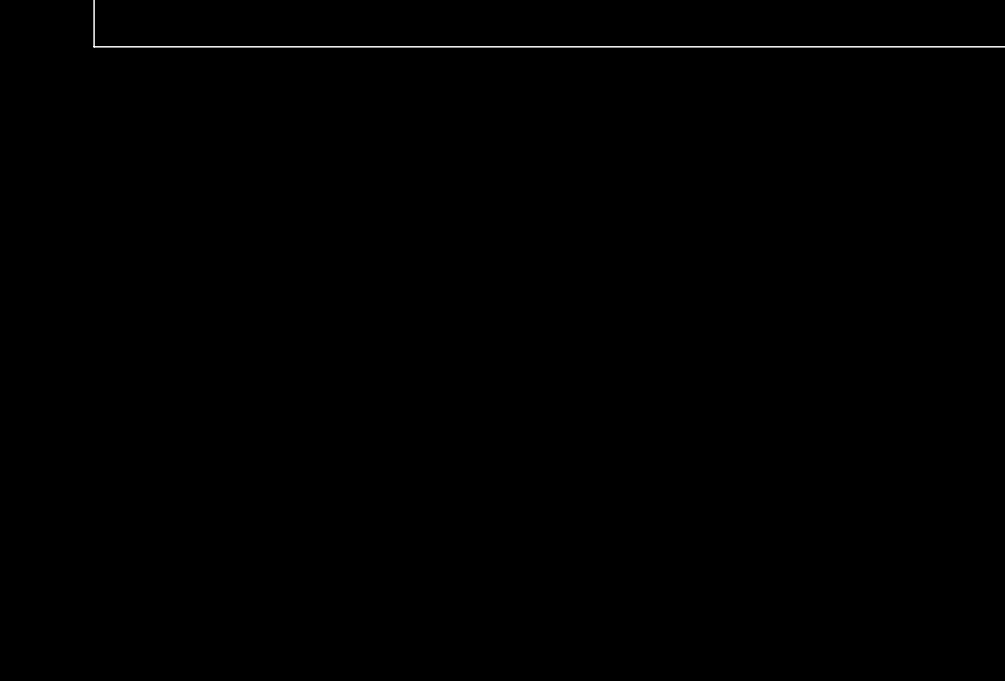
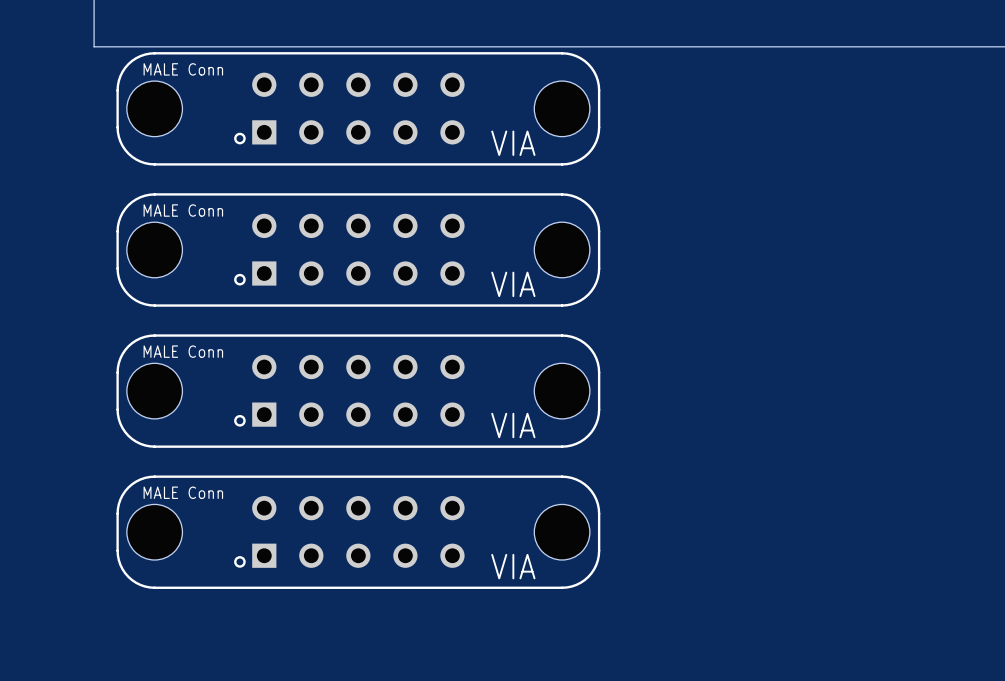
part: none -> (358, 108)
part: none -> (358, 249)
part: none -> (358, 391)
part: none -> (358, 532)

